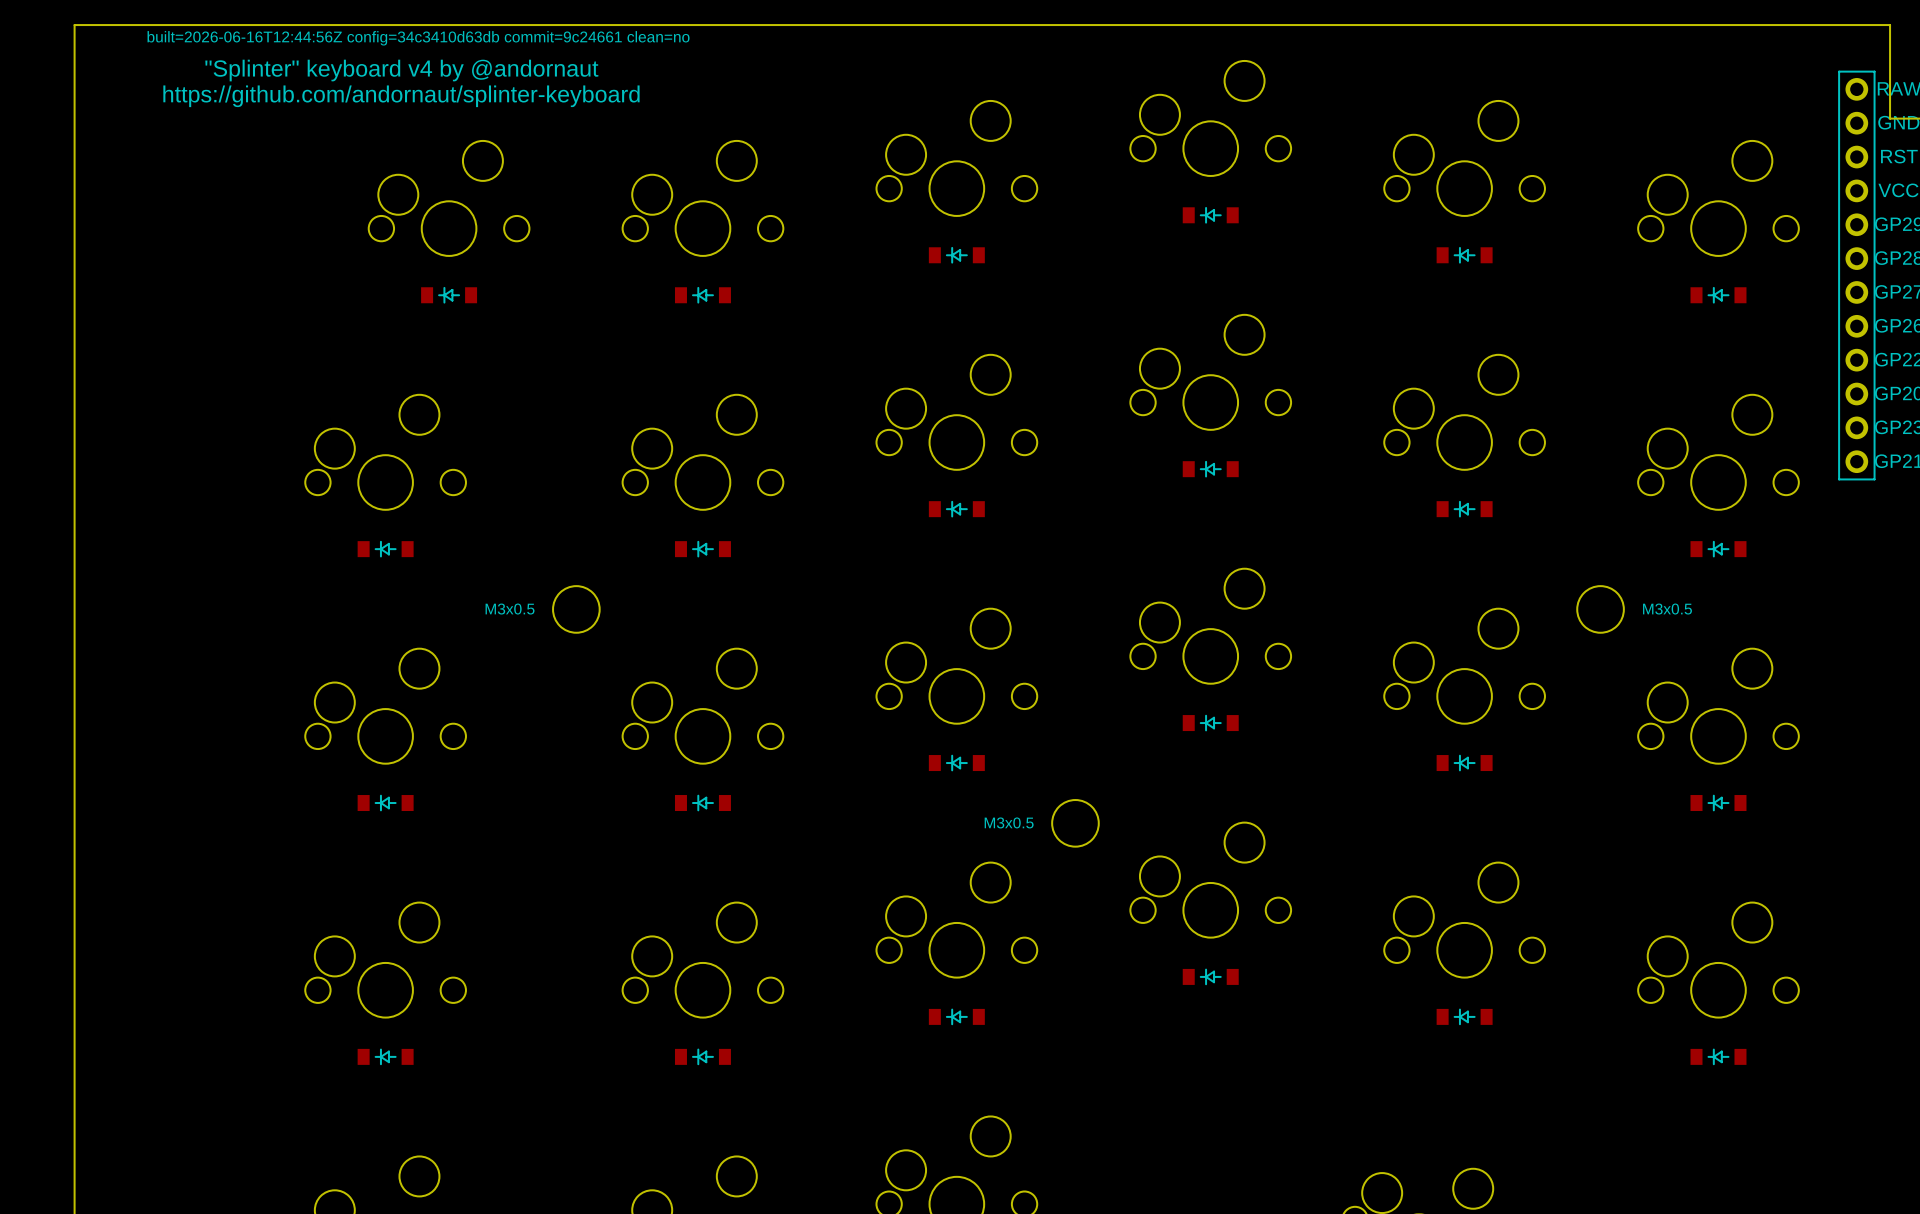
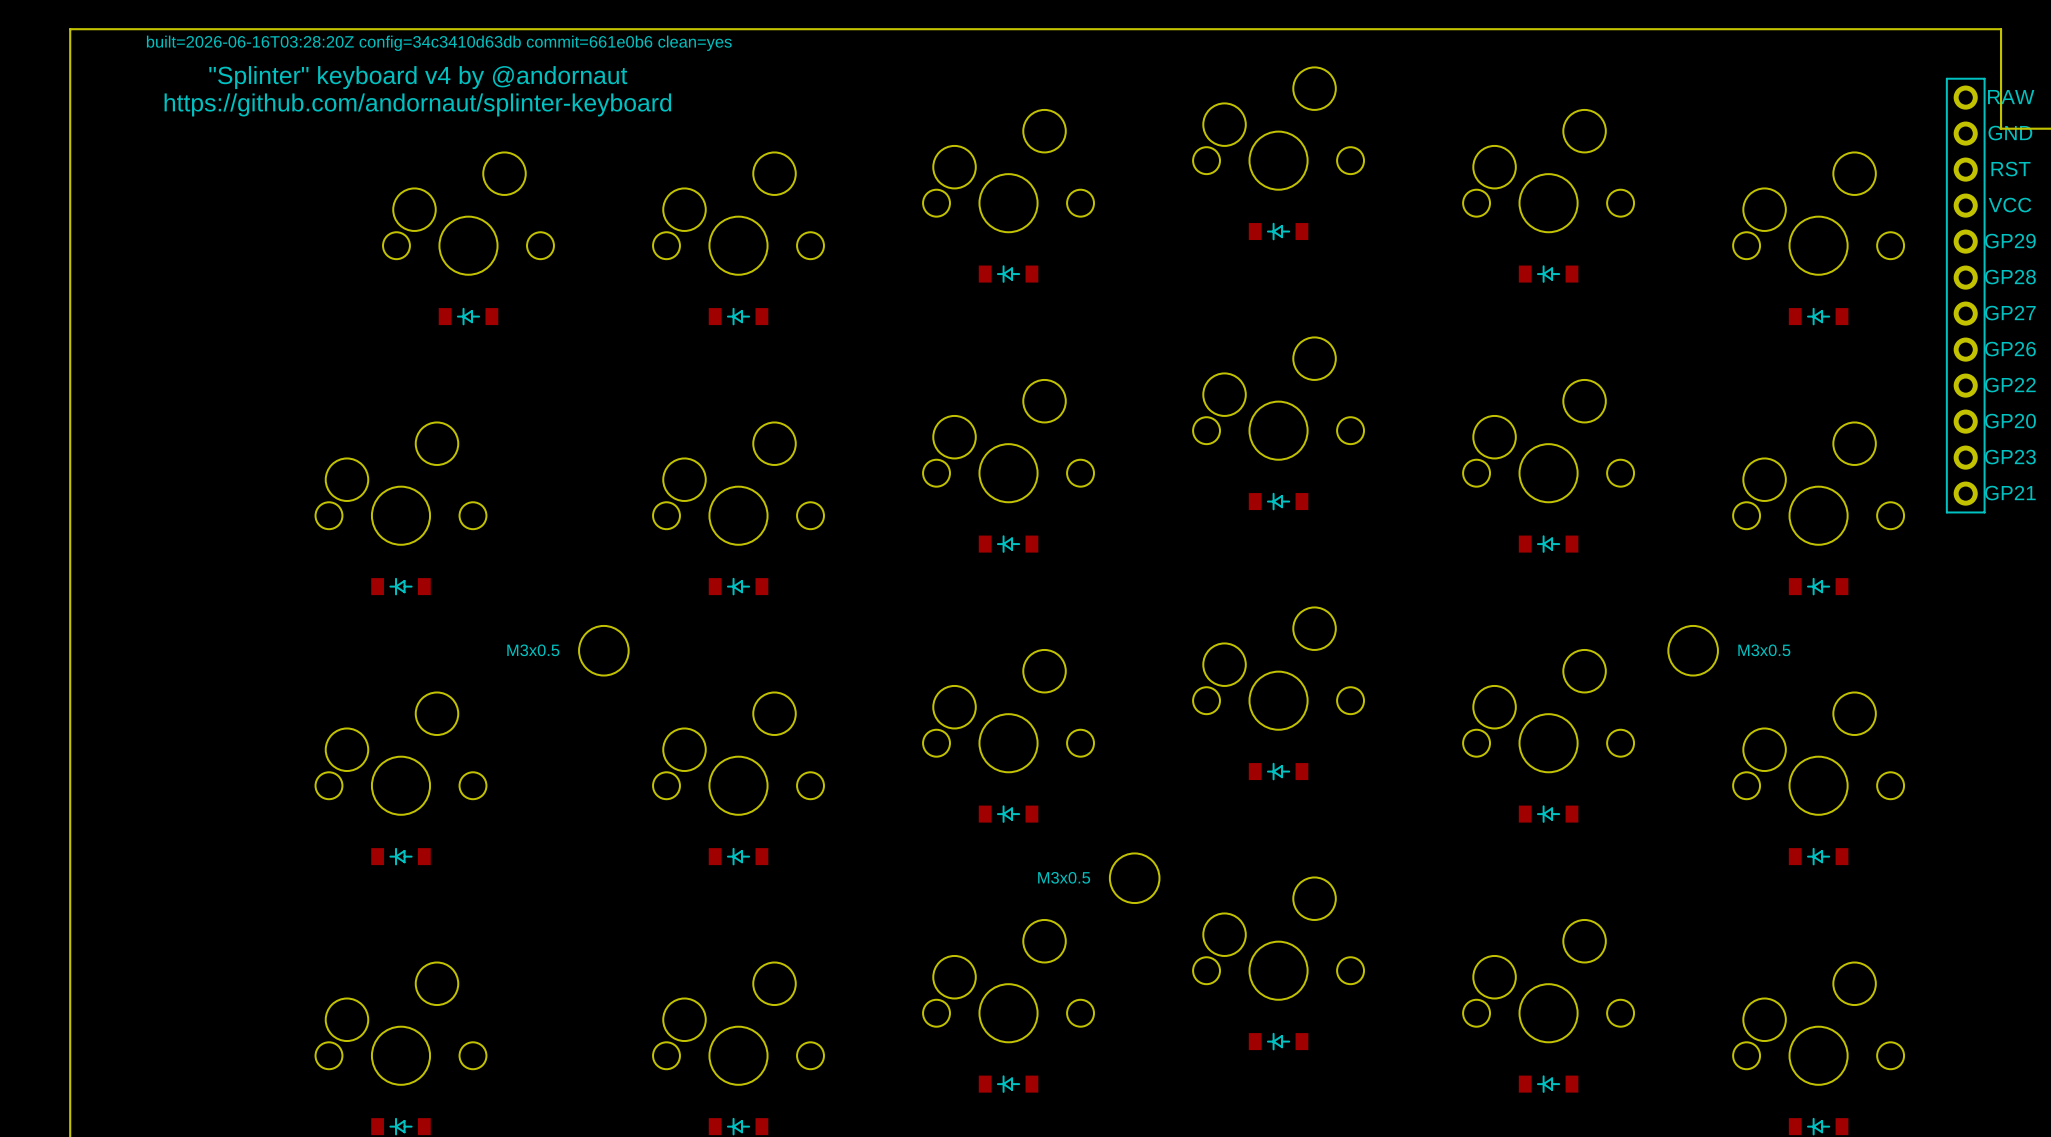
text: built=2026-06-16T12:44:56Z config=34c3410d63db commit=9c24661 clean=no (418, 38) -> built=2026-06-16T03:28:20Z config=34c3410d63db commit=661e0b6 clean=yes (439, 43)

